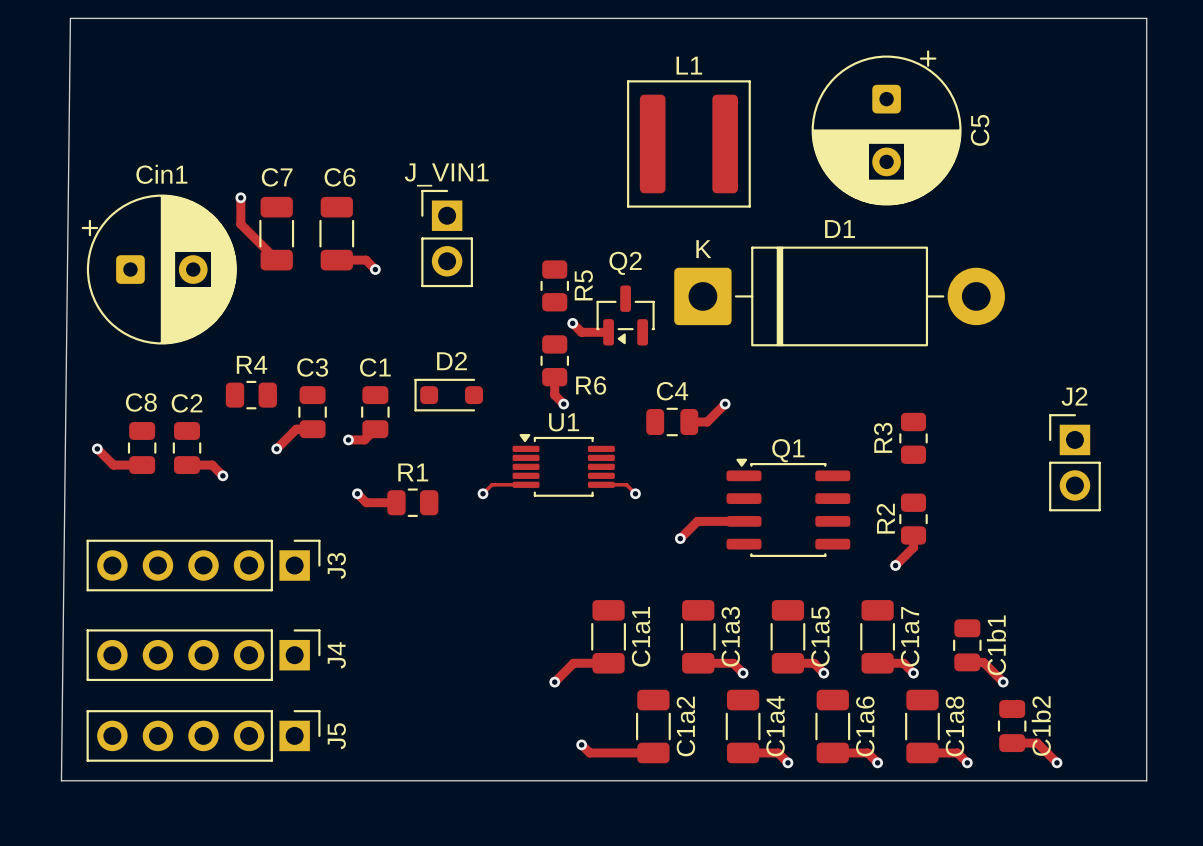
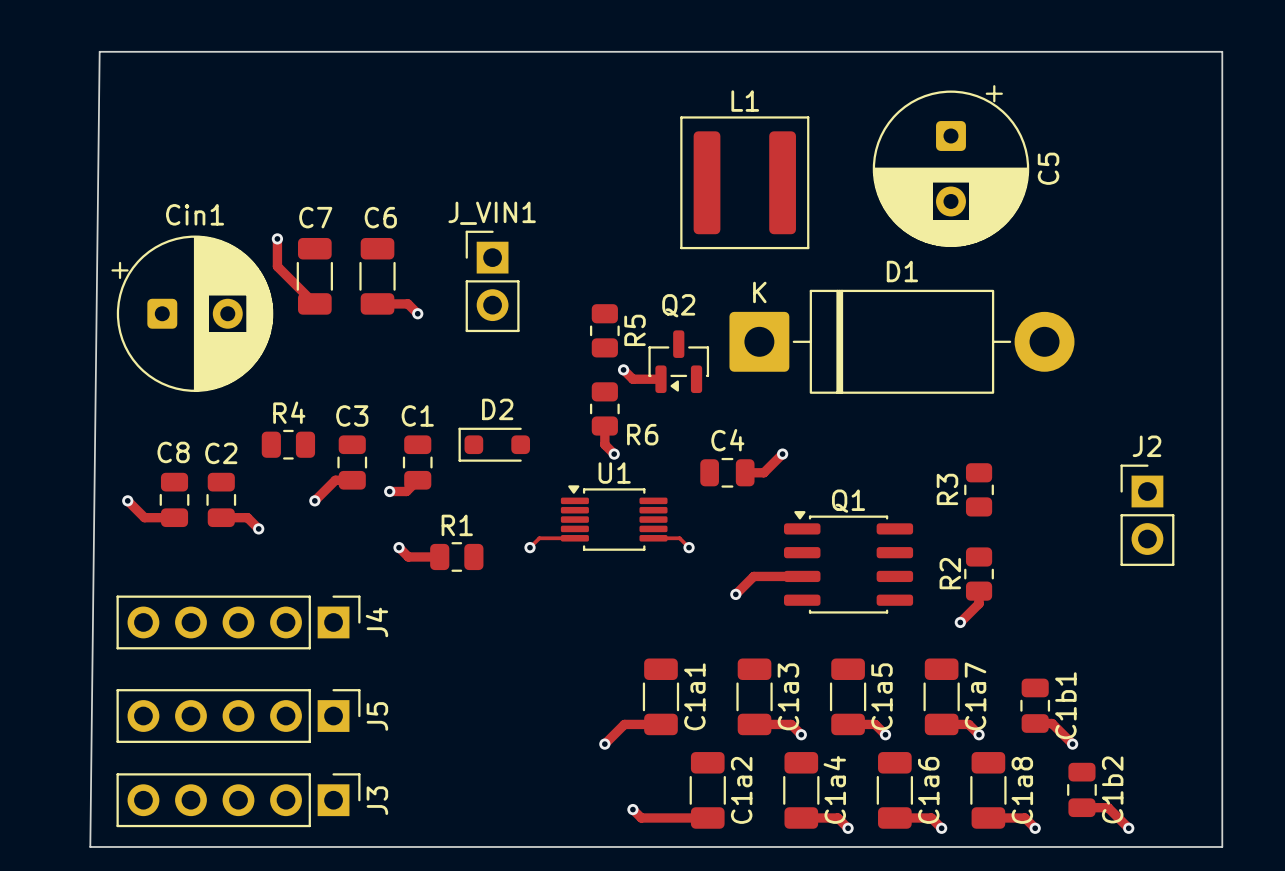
J3 name: J3 (336, 565) -> J4 (376, 622)
J4 name: J4 (336, 655) -> J5 (377, 716)
J5 name: J5 (336, 736) -> J3 (377, 800)

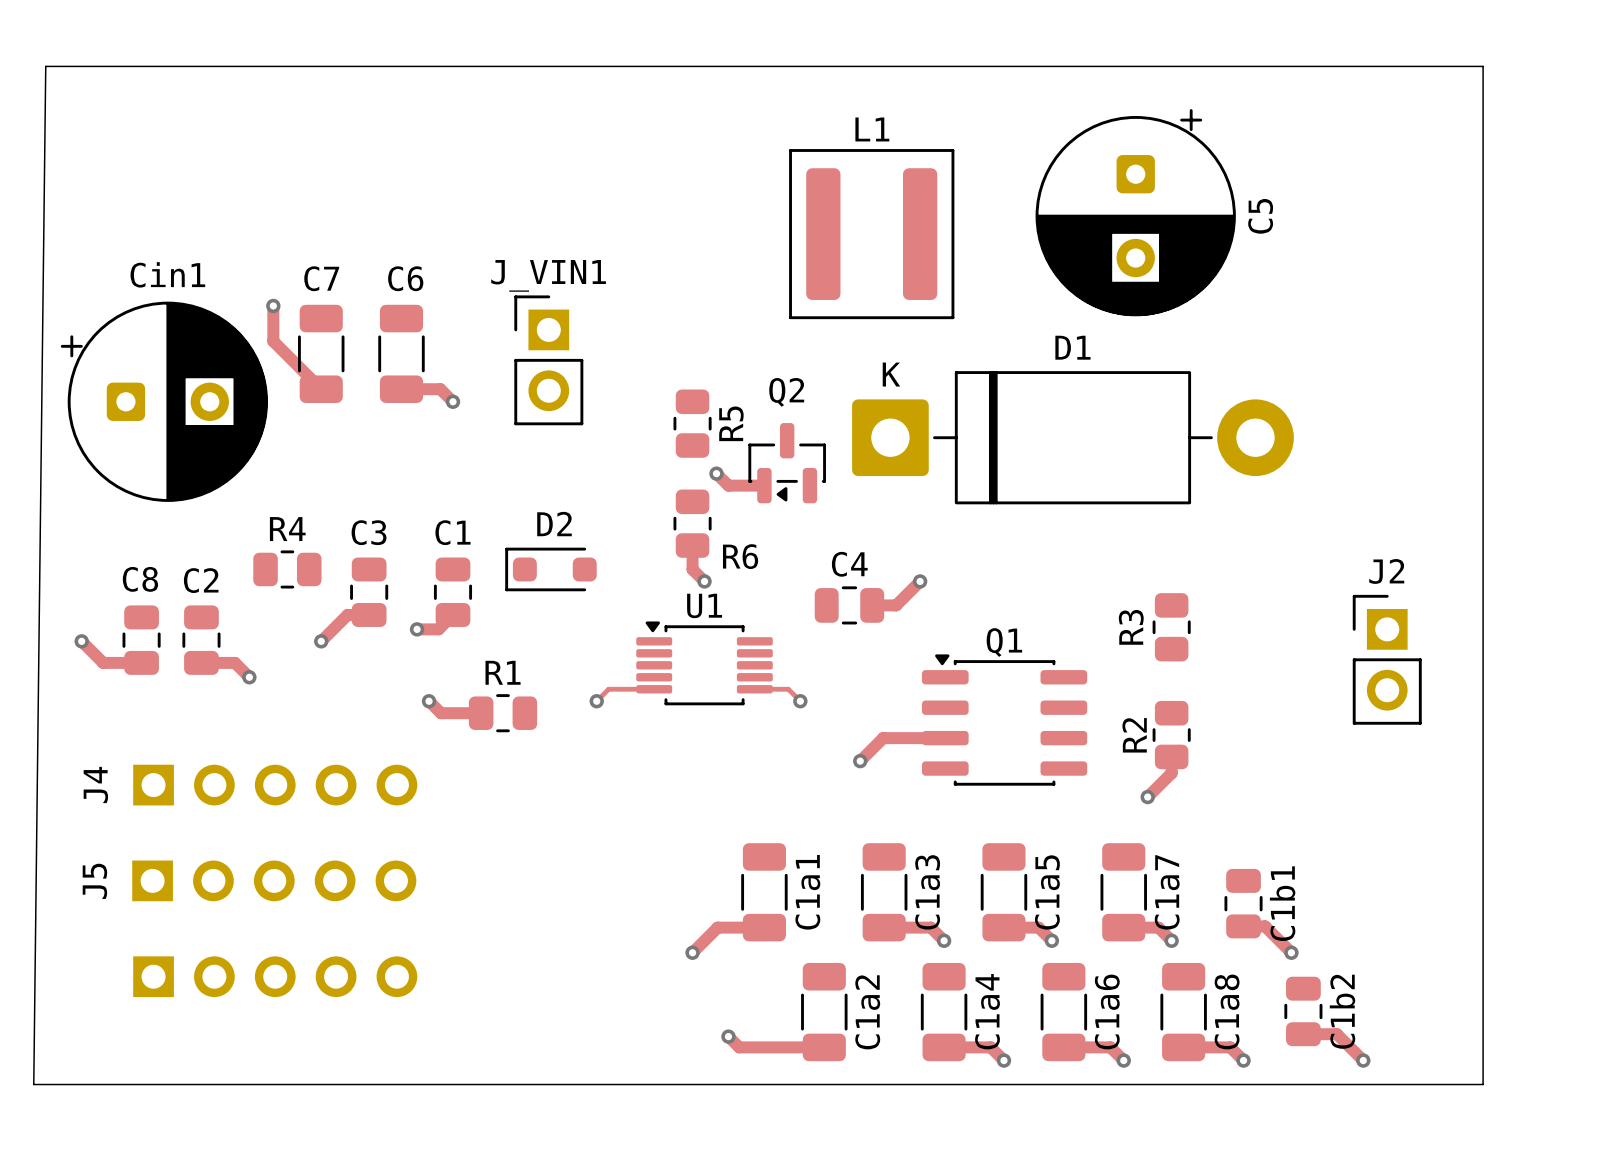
J4 side: top (238, 622) -> bottom (275, 785)
J5 side: top (238, 716) -> bottom (274, 880)
J3 side: top (238, 800) -> bottom (275, 976)

